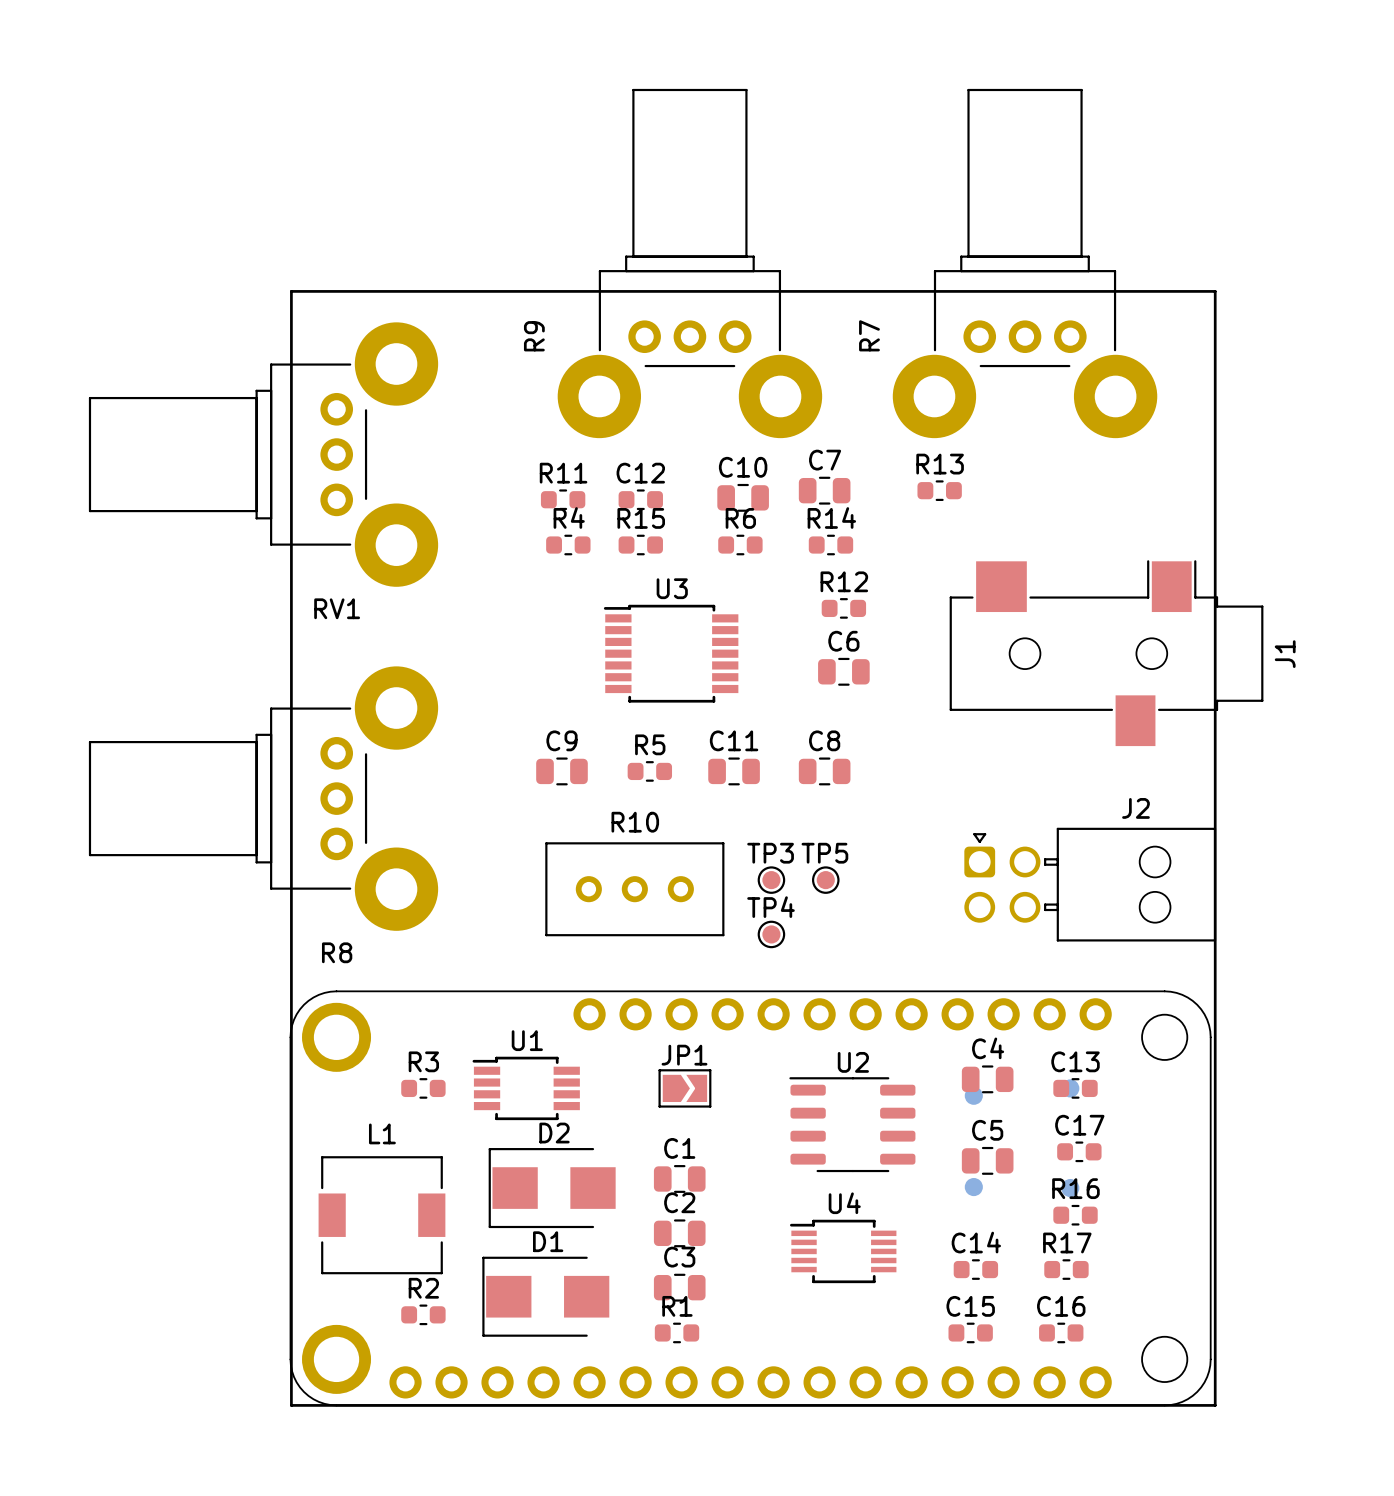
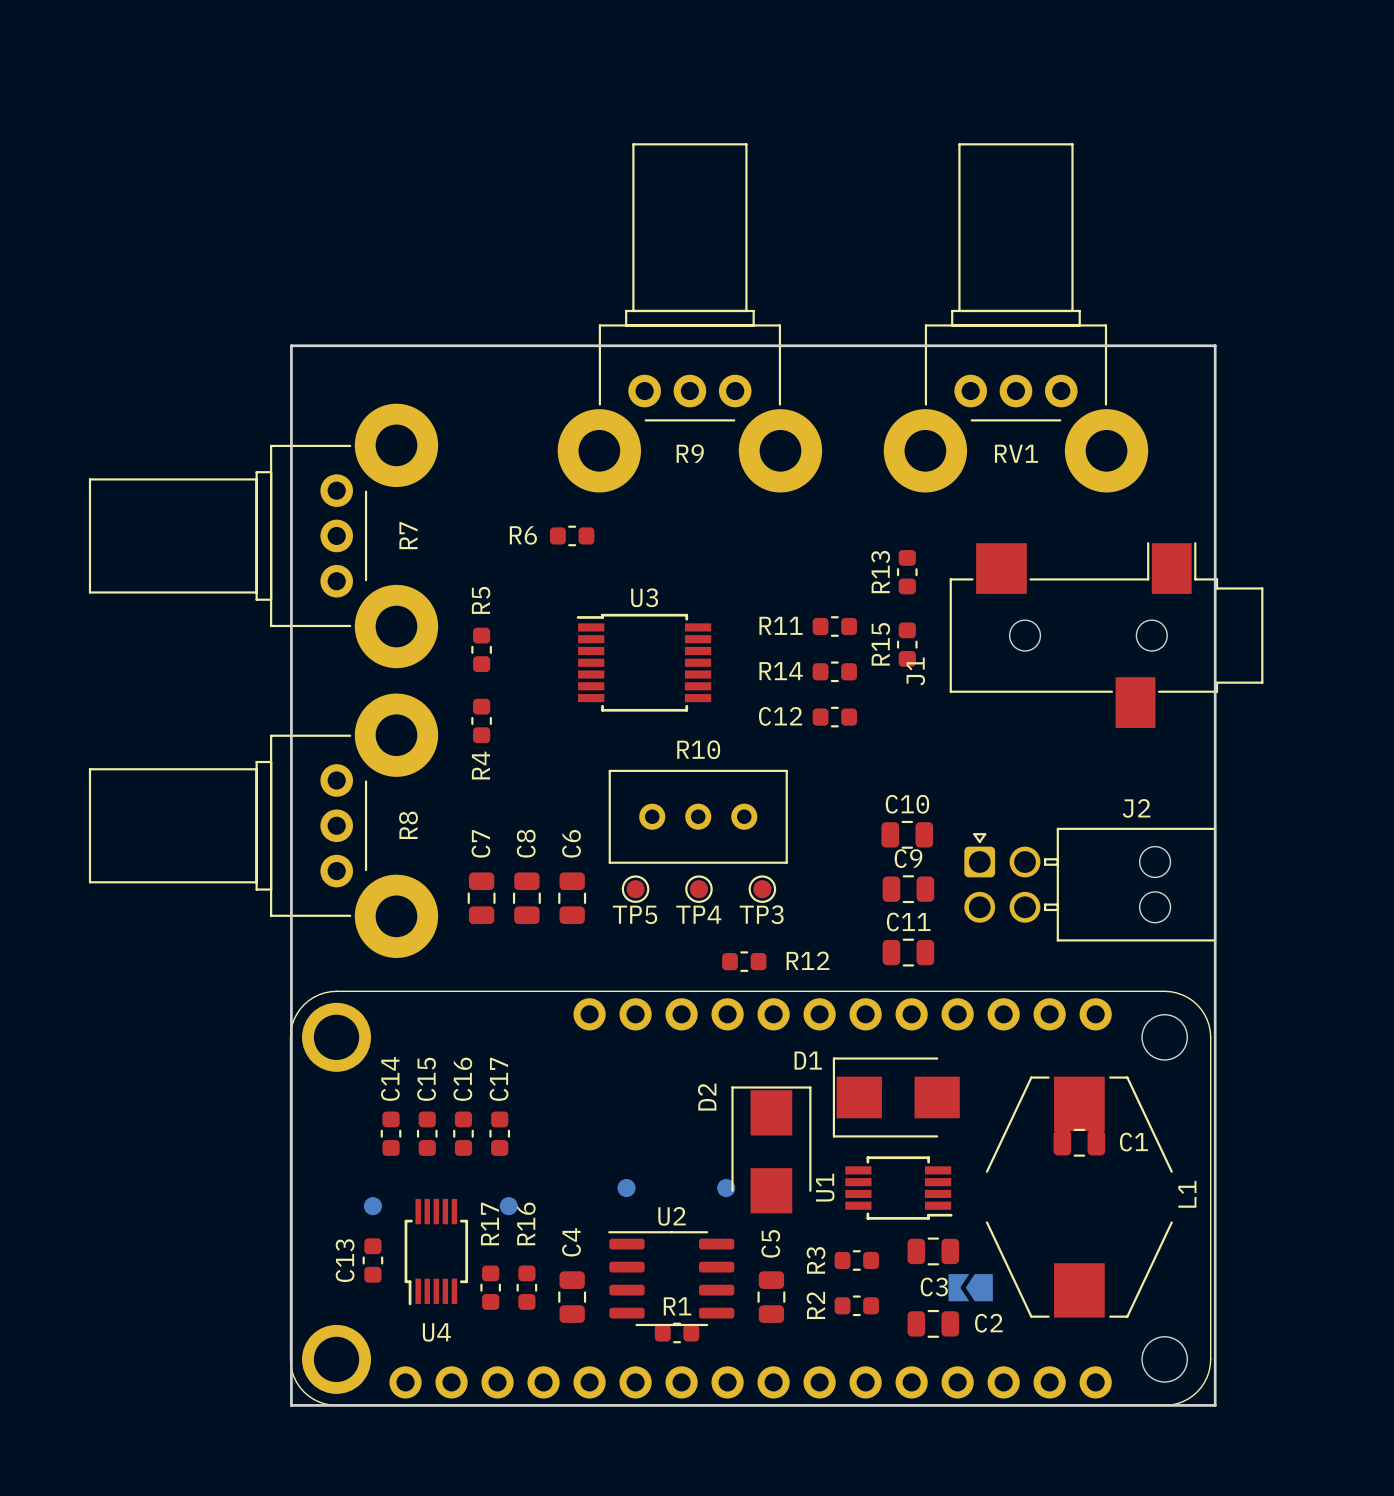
R9 position: (689, 263) -> (689, 317)
R7 rotation: 0° (1025, 263) -> 90° counterclockwise (263, 535)
R7 position: (1025, 263) -> (263, 535)
R7 name position: R7 (869, 335) -> R7 (408, 535)
R9 name rotation: 0° (534, 336) -> 90° clockwise (690, 453)
R9 name position: R9 (534, 336) -> R9 (690, 453)
board edge: (291, 345) (291, 291) (1215, 291) (1215, 345) -> (291, 345) (1215, 345)
RV1 rotation: 0° (263, 454) -> 90° clockwise (1015, 317)
RV1 position: (263, 454) -> (1015, 317)
R13 name position: R13 (940, 464) -> R13 (880, 572)
R11 name position: R11 (563, 473) -> R11 (781, 625)
C12 name position: C12 (640, 473) -> C12 (780, 716)
C7 rotation: 0° (824, 490) -> 90° clockwise (481, 898)
C7 position: (824, 490) -> (481, 898)
R13 rotation: 0° (939, 490) -> 90° clockwise (907, 572)
R13 position: (939, 490) -> (907, 572)
C10 position: (743, 497) -> (907, 834)
R11 position: (563, 499) -> (834, 626)
C12 position: (640, 499) -> (834, 717)
R4 name position: R4 (569, 517) -> R4 (480, 765)
R14 name position: R14 (831, 517) -> R14 (781, 671)
R15 name position: R15 (641, 518) -> R15 (880, 644)
R6 name position: R6 (740, 518) -> R6 (523, 535)
R4 rotation: 0° (568, 545) -> 90° clockwise (481, 720)
R4 position: (568, 545) -> (481, 720)
R15 rotation: 0° (640, 545) -> 90° clockwise (907, 644)
R15 position: (640, 545) -> (907, 644)
R6 position: (740, 545) -> (572, 535)
R14 position: (830, 545) -> (834, 671)
R12 name position: R12 (844, 581) -> R12 (808, 960)
RV1 name position: RV1 (337, 608) -> RV1 (1016, 453)
R12 position: (843, 608) -> (744, 961)
U3 position: (671, 653) -> (643, 662)
J1 position: (1106, 653) -> (1106, 635)
J1 name position: J1 (1285, 654) -> J1 (915, 671)
C6 rotation: 0° (843, 671) -> 90° clockwise (572, 898)
C6 position: (843, 671) -> (572, 898)
C9 position: (561, 771) -> (908, 889)
R5 rotation: 0° (649, 771) -> 90° clockwise (481, 649)
R5 position: (649, 771) -> (481, 649)
C11 position: (734, 771) -> (908, 952)
C8 rotation: 0° (824, 771) -> 90° clockwise (526, 898)
C8 position: (824, 771) -> (526, 898)
R8 position: (263, 798) -> (263, 825)
TP3 name position: TP3 (770, 853) -> TP3 (761, 914)
TP5 name position: TP5 (824, 853) -> TP5 (635, 914)
TP3 position: (771, 880) -> (762, 889)
TP5 position: (825, 880) -> (635, 889)
R10 position: (634, 889) -> (698, 816)
TP4 name position: TP4 (771, 907) -> TP4 (698, 914)
TP4 position: (771, 934) -> (698, 889)
R8 name rotation: 0° (337, 952) -> 90° counterclockwise (408, 825)
R8 name position: R8 (337, 952) -> R8 (408, 825)
U1 name position: U1 (527, 1040) -> U1 (825, 1187)
R3 name rotation: 0° (423, 1061) -> 90° counterclockwise (816, 1260)
R3 name position: R3 (423, 1061) -> R3 (816, 1260)
C13 name position: C13 (1075, 1061) -> C13 (345, 1260)
C4 rotation: 0° (987, 1079) -> 90° clockwise (572, 1297)
C4 position: (987, 1079) -> (572, 1297)
R3 position: (423, 1088) -> (856, 1260)
U1 rotation: 0° (526, 1088) -> 180° (898, 1188)
U1 position: (526, 1088) -> (898, 1188)
JP1 side: top (684, 1088) -> bottom (970, 1287)
part: (1070, 1088) -> none
C13 rotation: 0° (1075, 1088) -> 90° clockwise (372, 1260)
C13 position: (1075, 1088) -> (372, 1260)
part: (973, 1095) -> none
U2 position: (852, 1124) -> (671, 1278)
L1 name position: L1 (382, 1133) -> L1 (1187, 1194)
D2 name position: D2 (554, 1133) -> D2 (707, 1097)
C1 name position: C1 (679, 1148) -> C1 (1134, 1142)
C17 rotation: 0° (1079, 1151) -> 90° clockwise (499, 1133)
C17 position: (1079, 1151) -> (499, 1133)
L1 footprint: [318, 1156, 446, 1275] -> [985, 1076, 1173, 1318]
C5 rotation: 0° (987, 1160) -> 90° clockwise (771, 1297)
C5 position: (987, 1160) -> (771, 1297)
C1 position: (679, 1178) -> (1079, 1142)
part: (973, 1187) -> none
D2 rotation: 0° (552, 1188) -> 90° clockwise (771, 1149)
D2 position: (552, 1188) -> (771, 1149)
part: none -> (626, 1188)
part: none -> (726, 1188)
part: (1070, 1188) -> none
R16 name position: R16 (1075, 1188) -> R16 (526, 1223)
C2 name position: C2 (679, 1202) -> C2 (988, 1323)
U4 name position: U4 (844, 1203) -> U4 (436, 1332)
part: none -> (372, 1206)
part: none -> (508, 1206)
R16 rotation: 0° (1075, 1215) -> 90° clockwise (526, 1287)
R16 position: (1075, 1215) -> (526, 1287)
C2 position: (679, 1233) -> (933, 1323)
D1 name position: D1 (548, 1241) -> D1 (808, 1060)
R17 name position: R17 (1067, 1242) -> R17 (489, 1224)
U4 rotation: 0° (843, 1251) -> 90° counterclockwise (436, 1252)
U4 position: (843, 1251) -> (436, 1252)
C3 name position: C3 (679, 1257) -> C3 (934, 1286)
C14 rotation: 0° (975, 1269) -> 90° clockwise (391, 1133)
C14 position: (975, 1269) -> (391, 1133)
R17 rotation: 0° (1066, 1269) -> 90° clockwise (490, 1287)
R17 position: (1066, 1269) -> (490, 1287)
C3 position: (679, 1287) -> (933, 1251)
R2 name rotation: 0° (423, 1288) -> 90° counterclockwise (815, 1305)
R2 name position: R2 (423, 1288) -> R2 (815, 1305)
D1 position: (545, 1296) -> (896, 1097)
R2 position: (423, 1314) -> (856, 1305)
C15 rotation: 0° (970, 1332) -> 90° clockwise (427, 1133)
C15 position: (970, 1332) -> (427, 1133)
C16 rotation: 0° (1061, 1332) -> 90° clockwise (463, 1133)
C16 position: (1061, 1332) -> (463, 1133)

